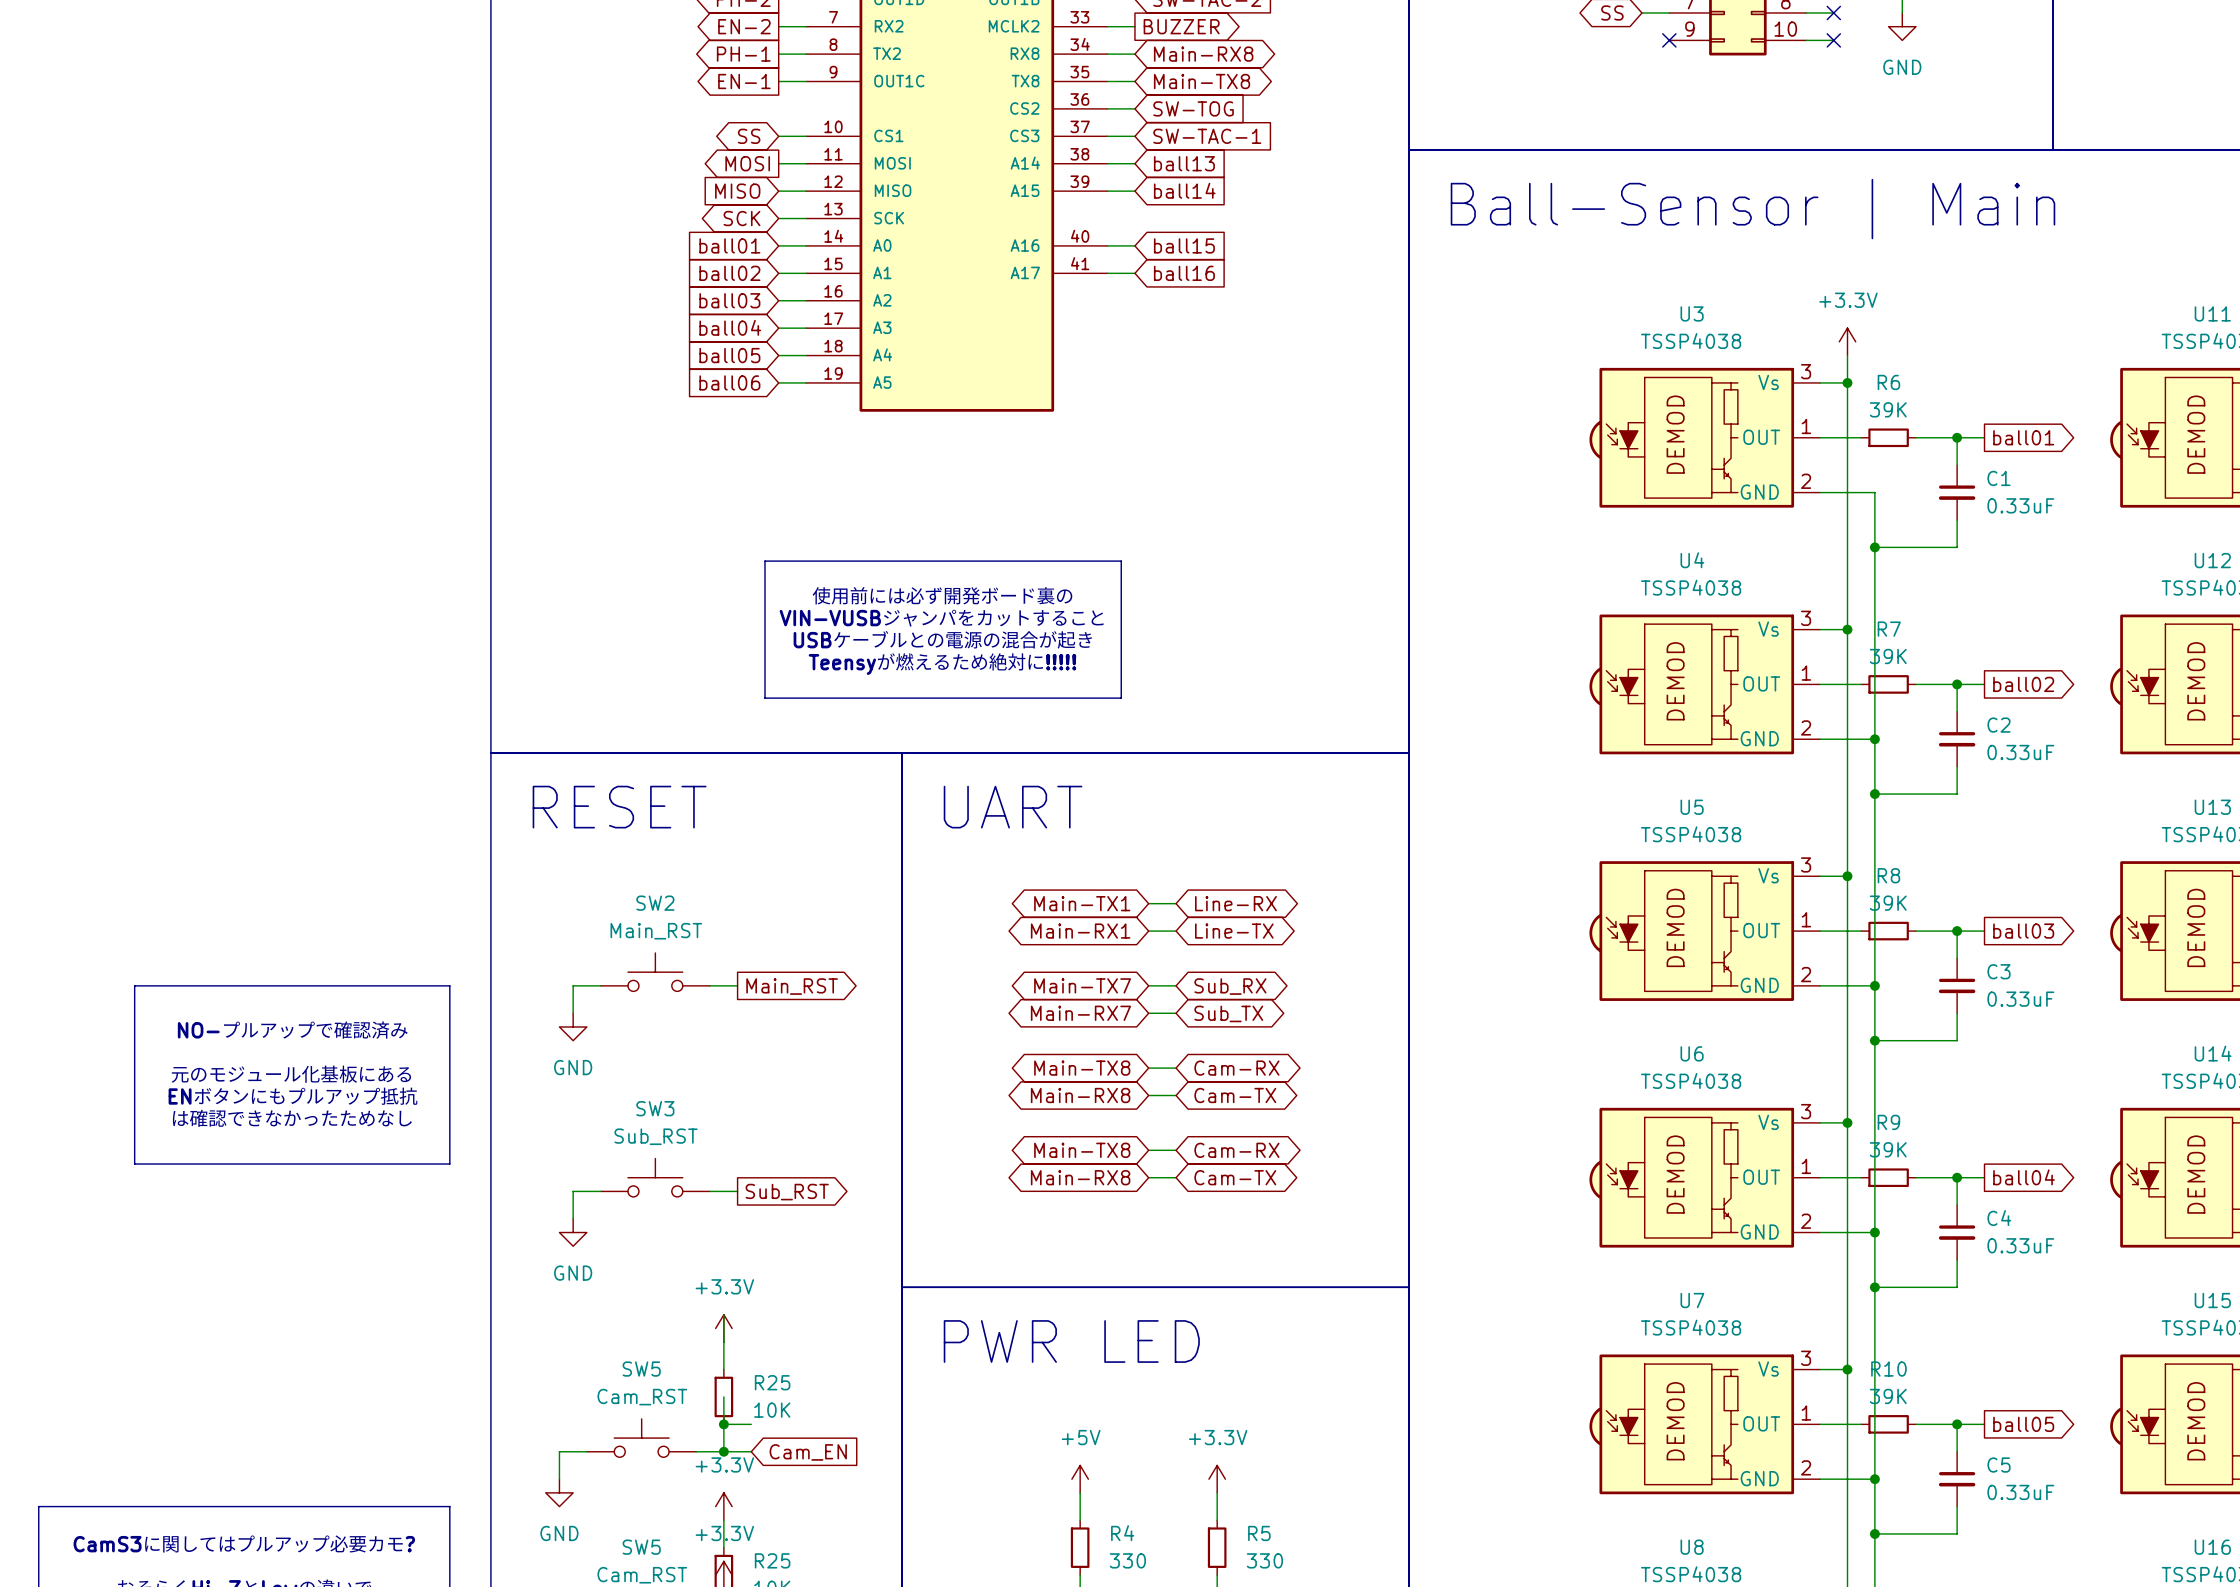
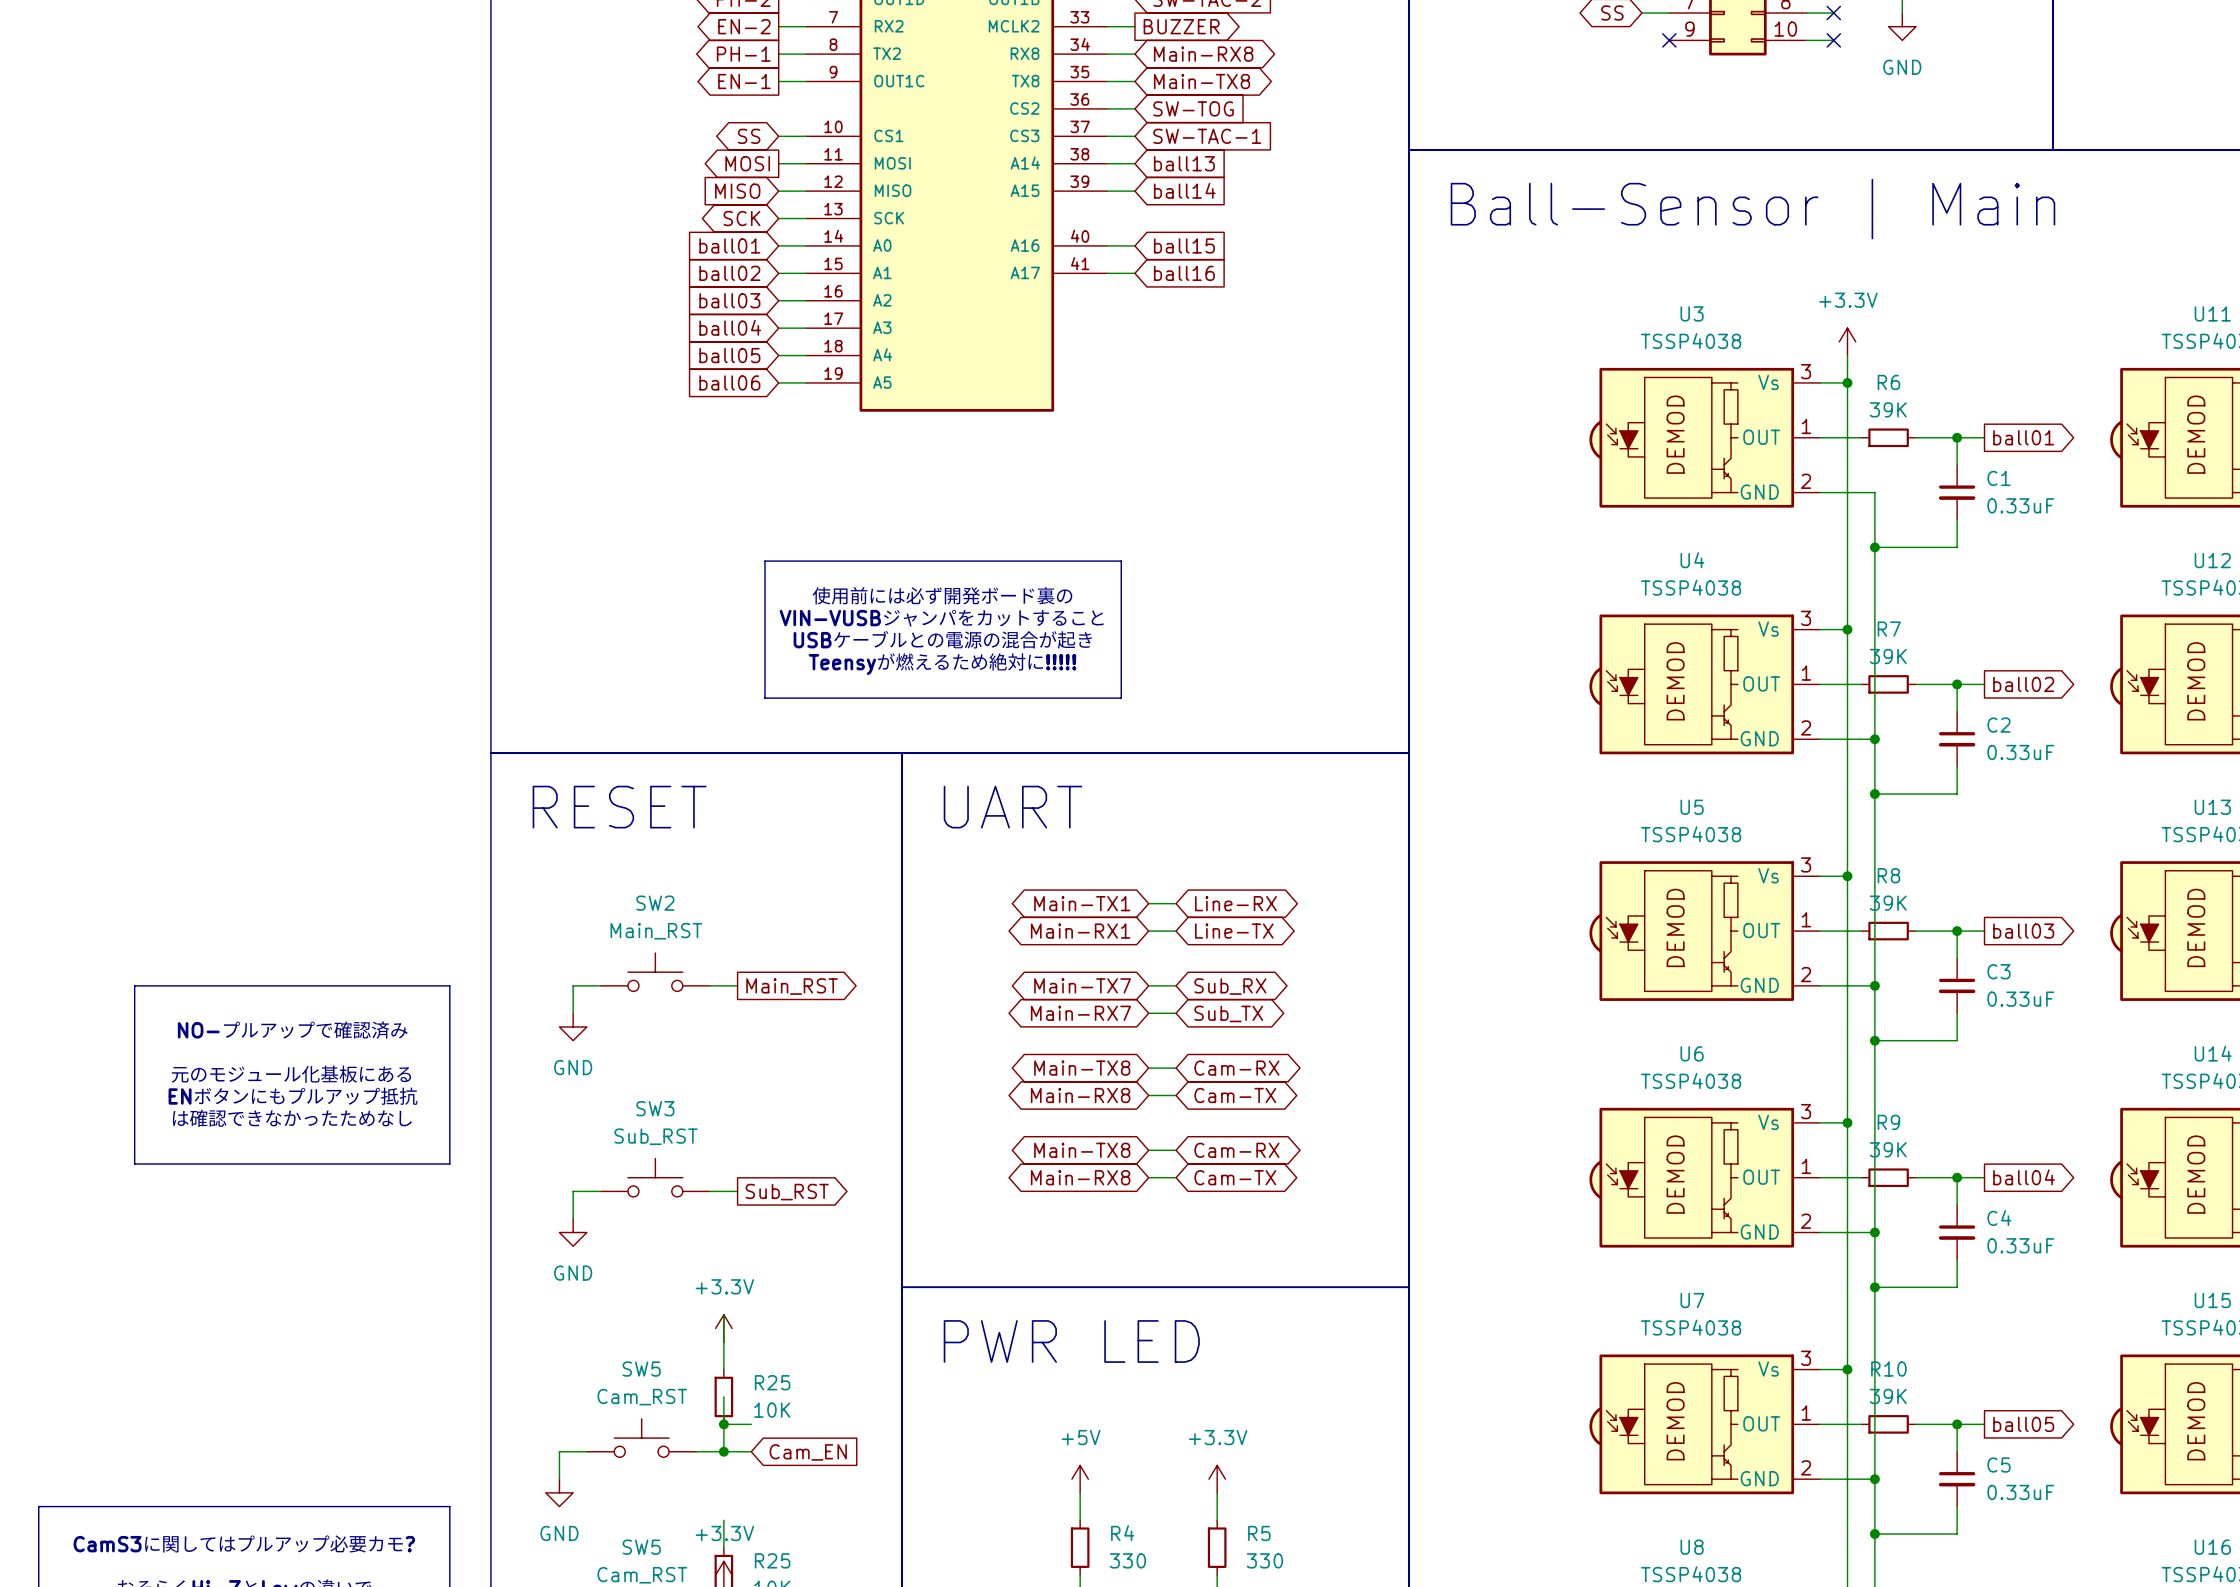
power symbol: +3.3V (723, 1506) -> none

